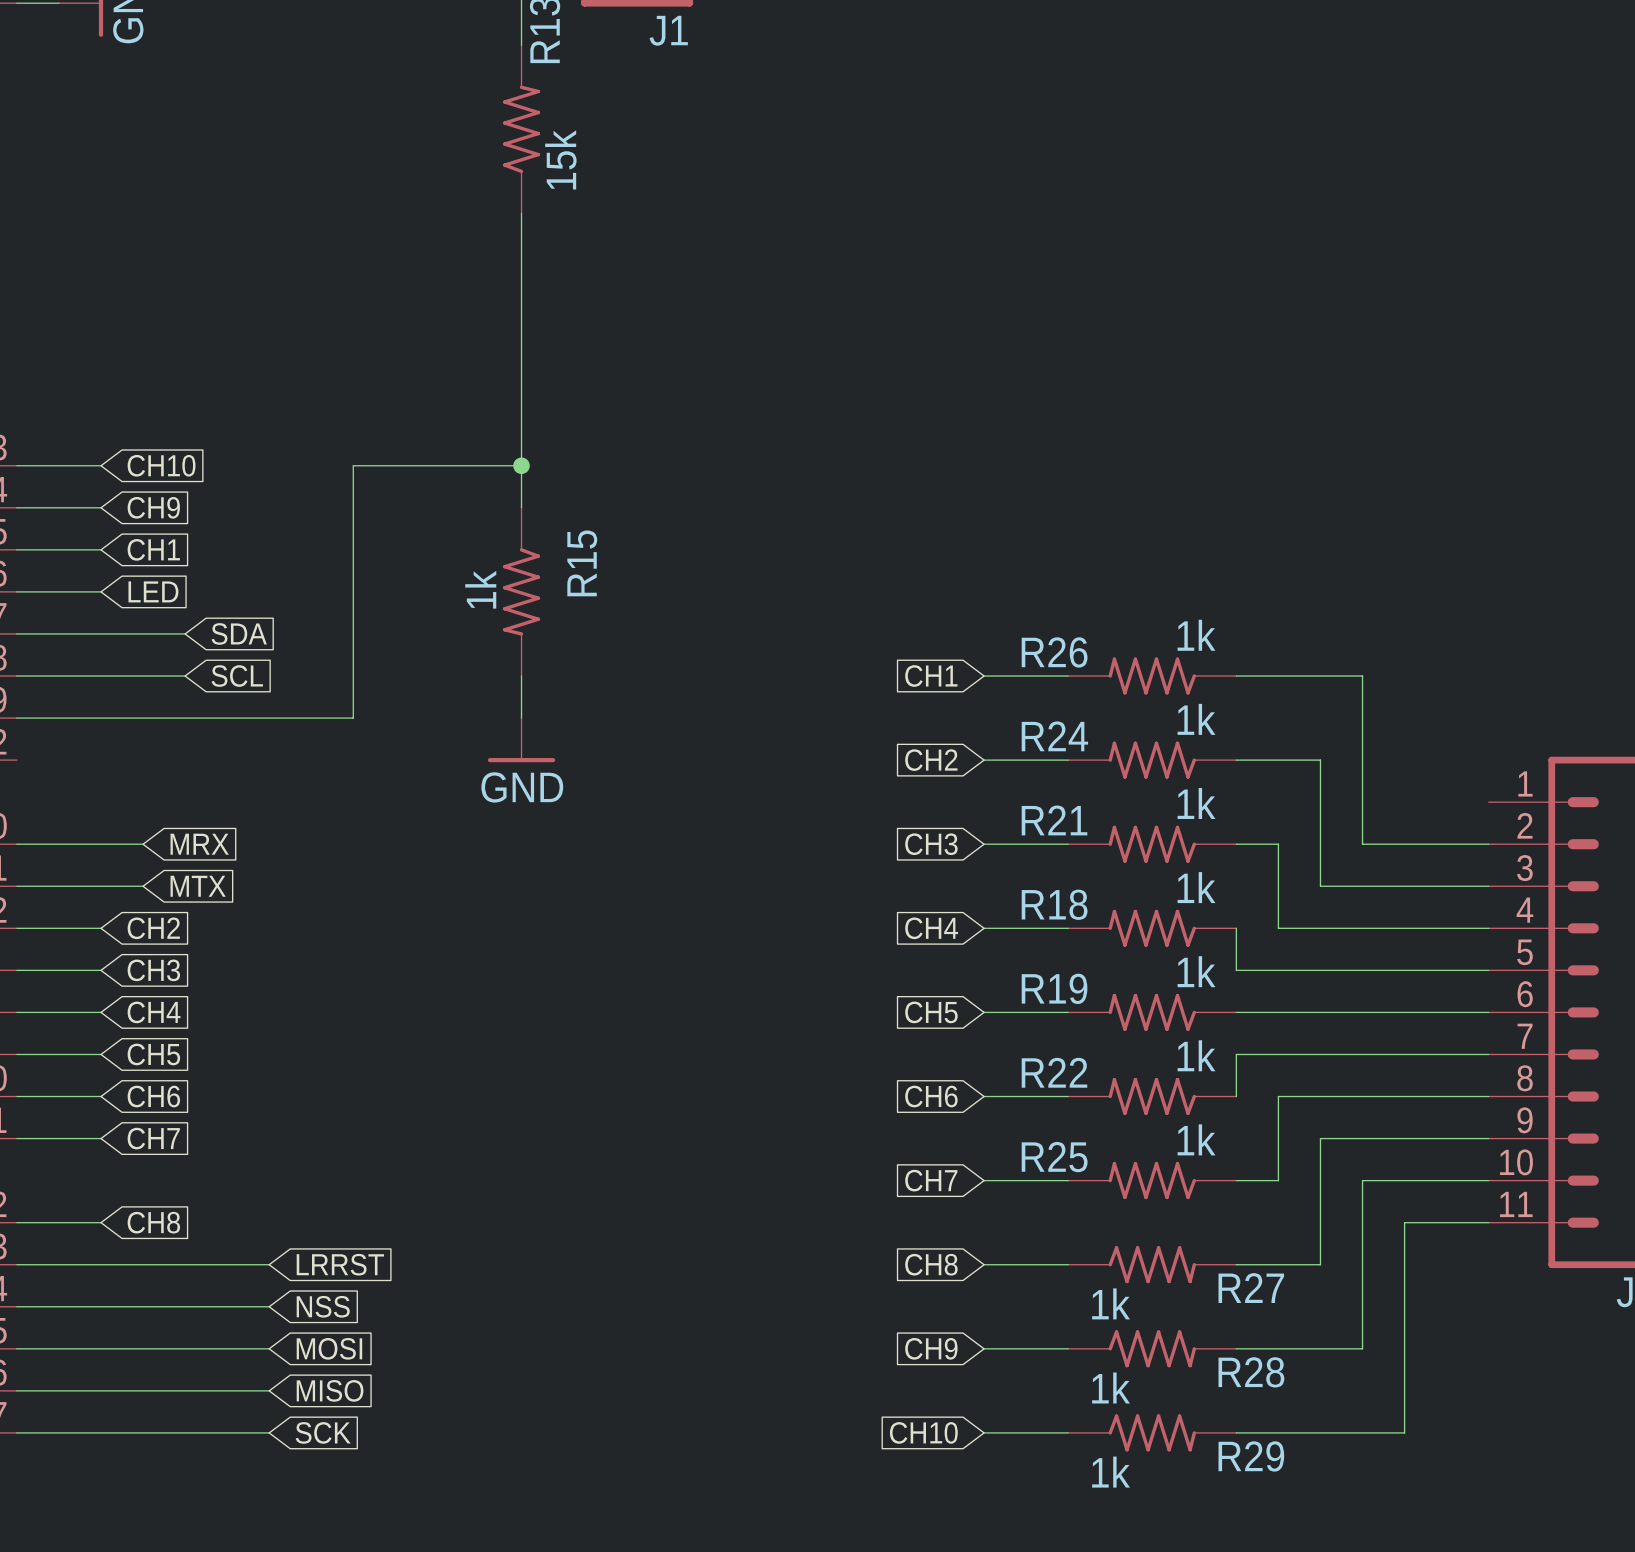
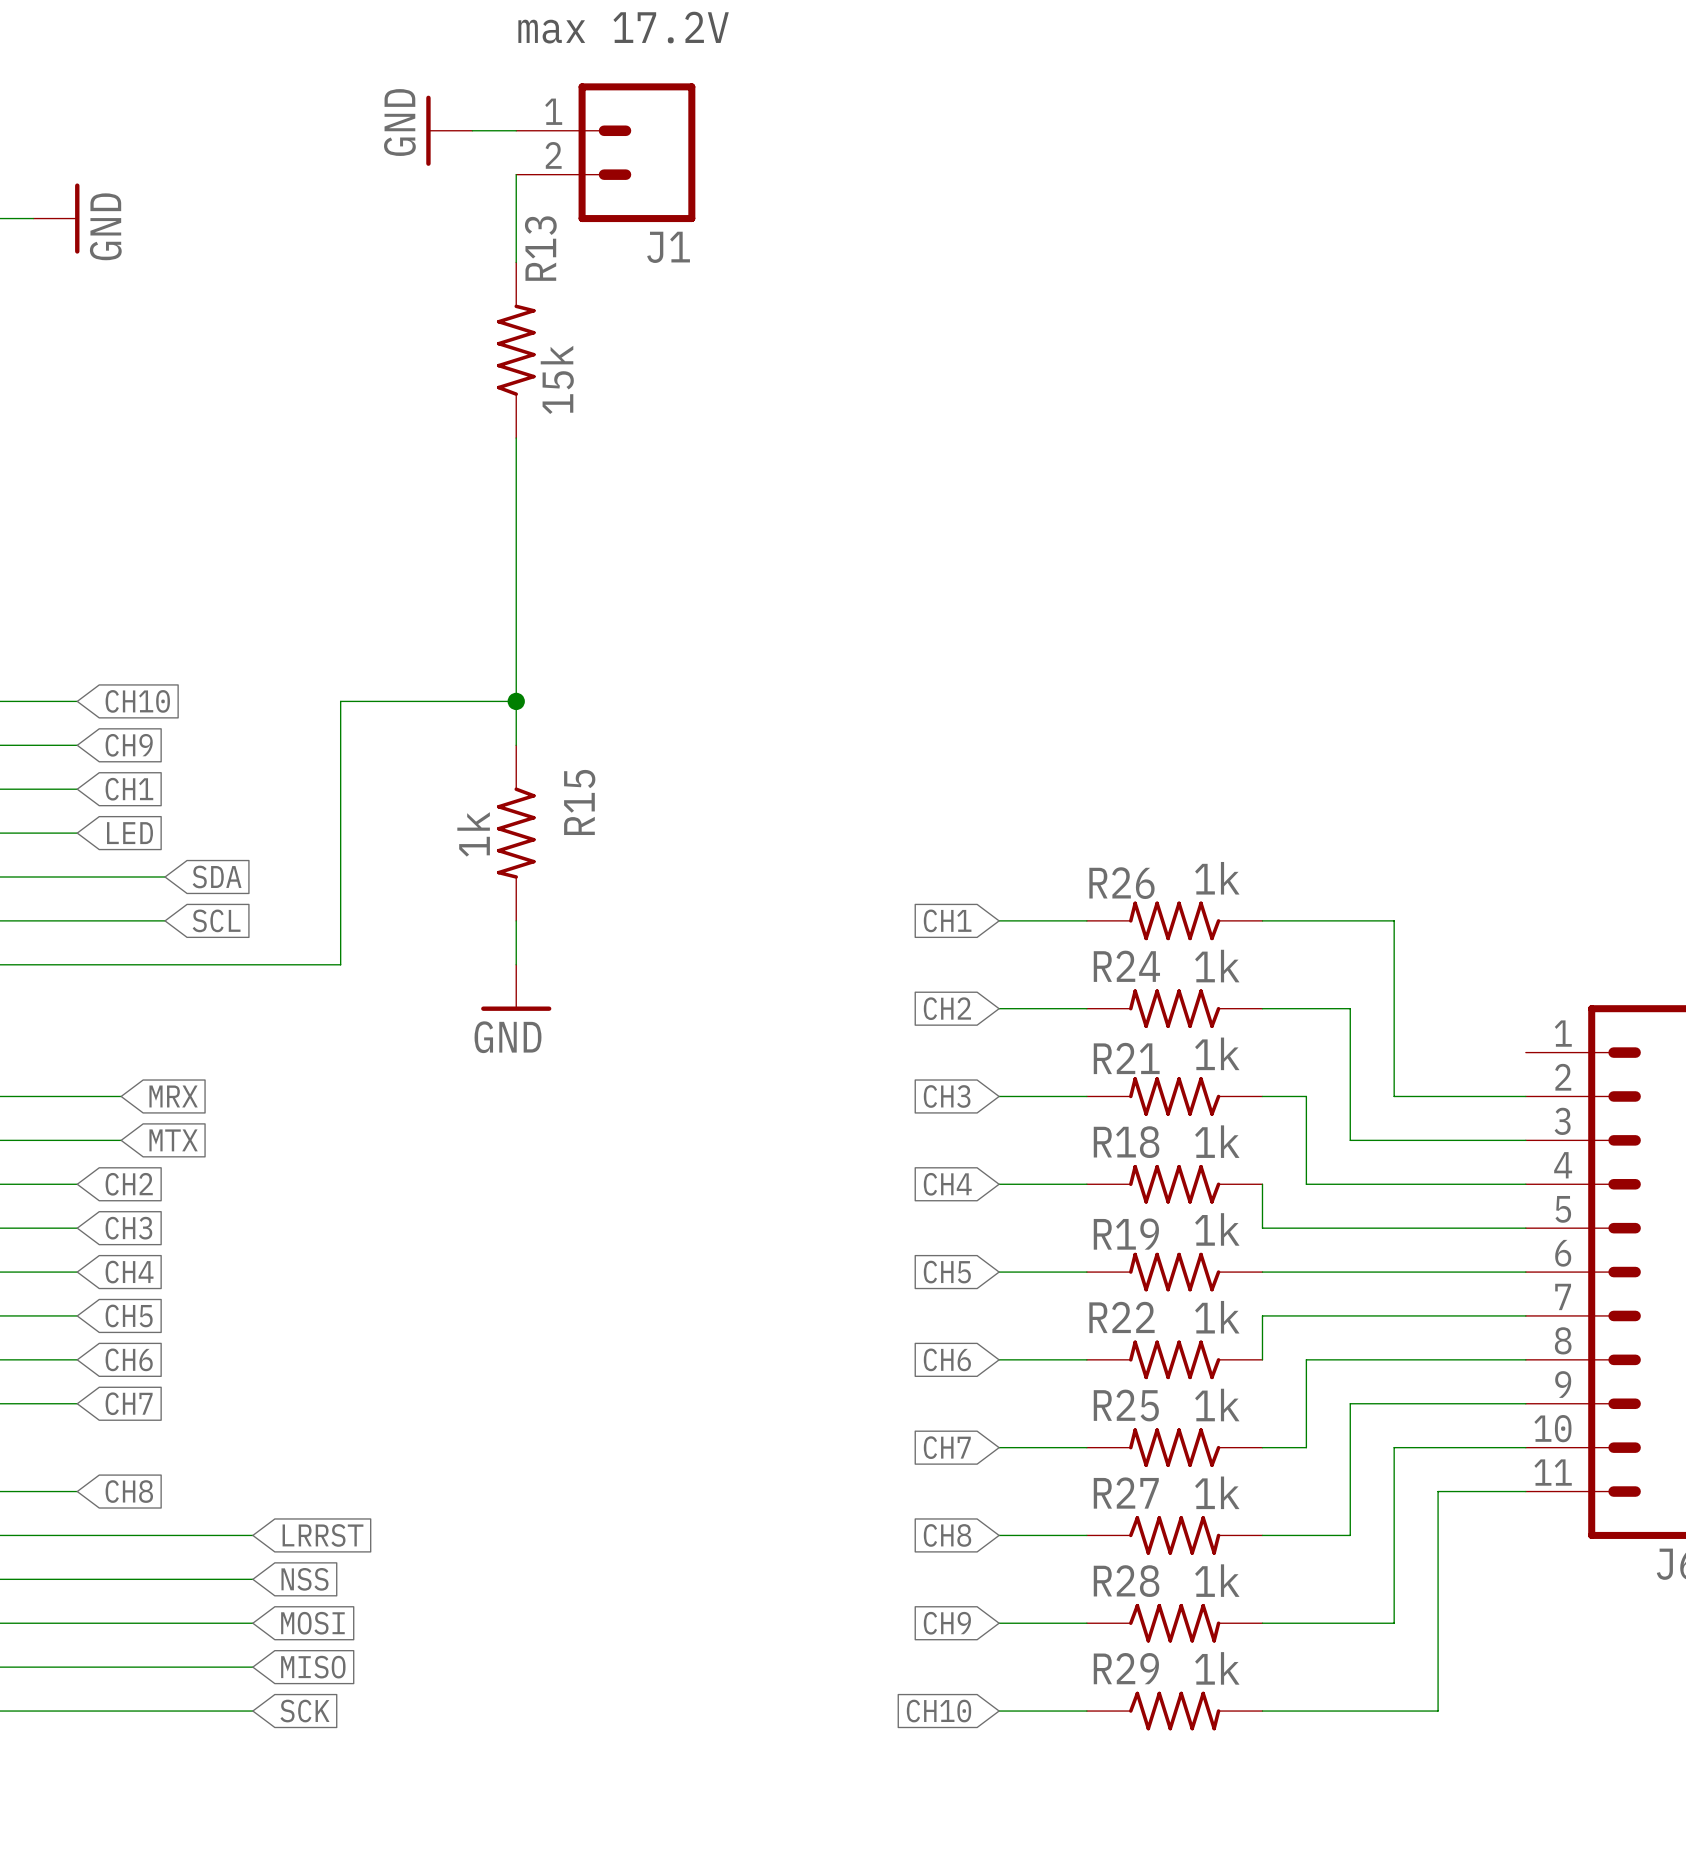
R26 name position: R26 (1054, 652) -> R26 (1121, 883)
R24 name position: R24 (1054, 736) -> R24 (1126, 966)
R21 name position: R21 (1054, 820) -> R21 (1126, 1058)
R18 name position: R18 (1054, 904) -> R18 (1126, 1142)
R19 name position: R19 (1054, 988) -> R19 (1126, 1234)
R22 name position: R22 (1054, 1072) -> R22 (1122, 1317)
R25 name position: R25 (1054, 1157) -> R25 (1126, 1405)
R27 name position: R27 (1251, 1288) -> R27 (1126, 1493)
R27 value position: 1k (1111, 1303) -> 1k (1217, 1492)
R28 name position: R28 (1251, 1372) -> R28 (1126, 1581)
R28 value position: 1k (1111, 1387) -> 1k (1217, 1580)
R29 name position: R29 (1251, 1456) -> R29 (1126, 1668)
R29 value position: 1k (1111, 1472) -> 1k (1217, 1668)

